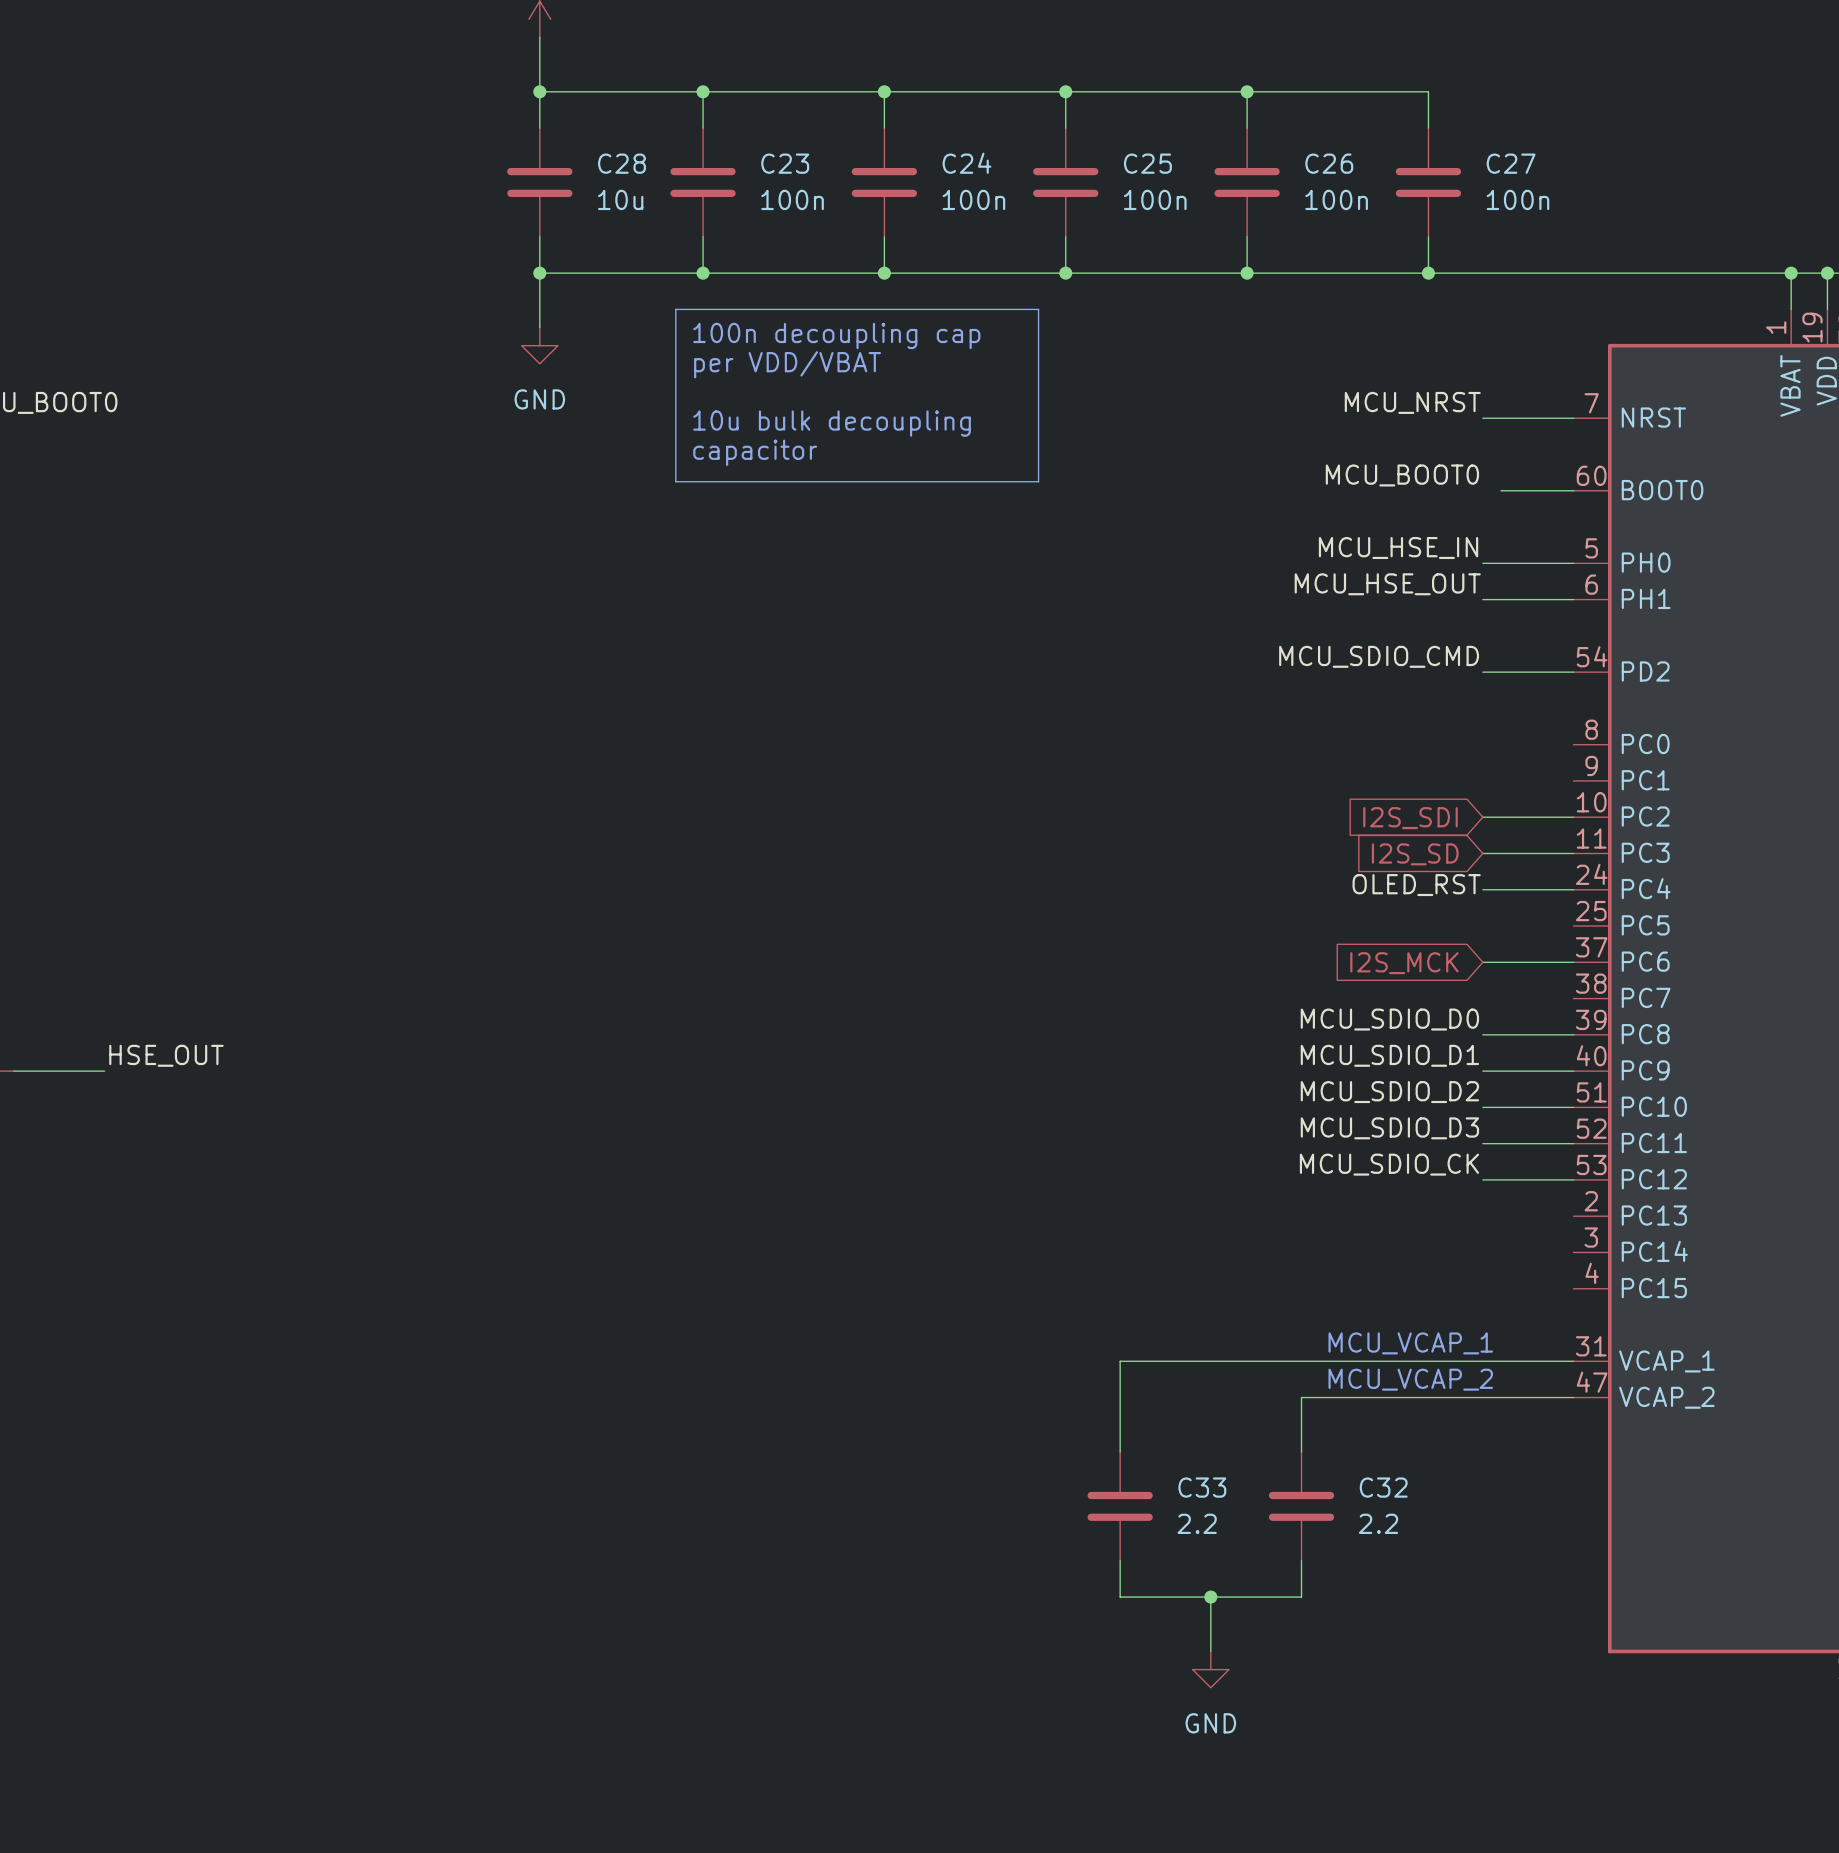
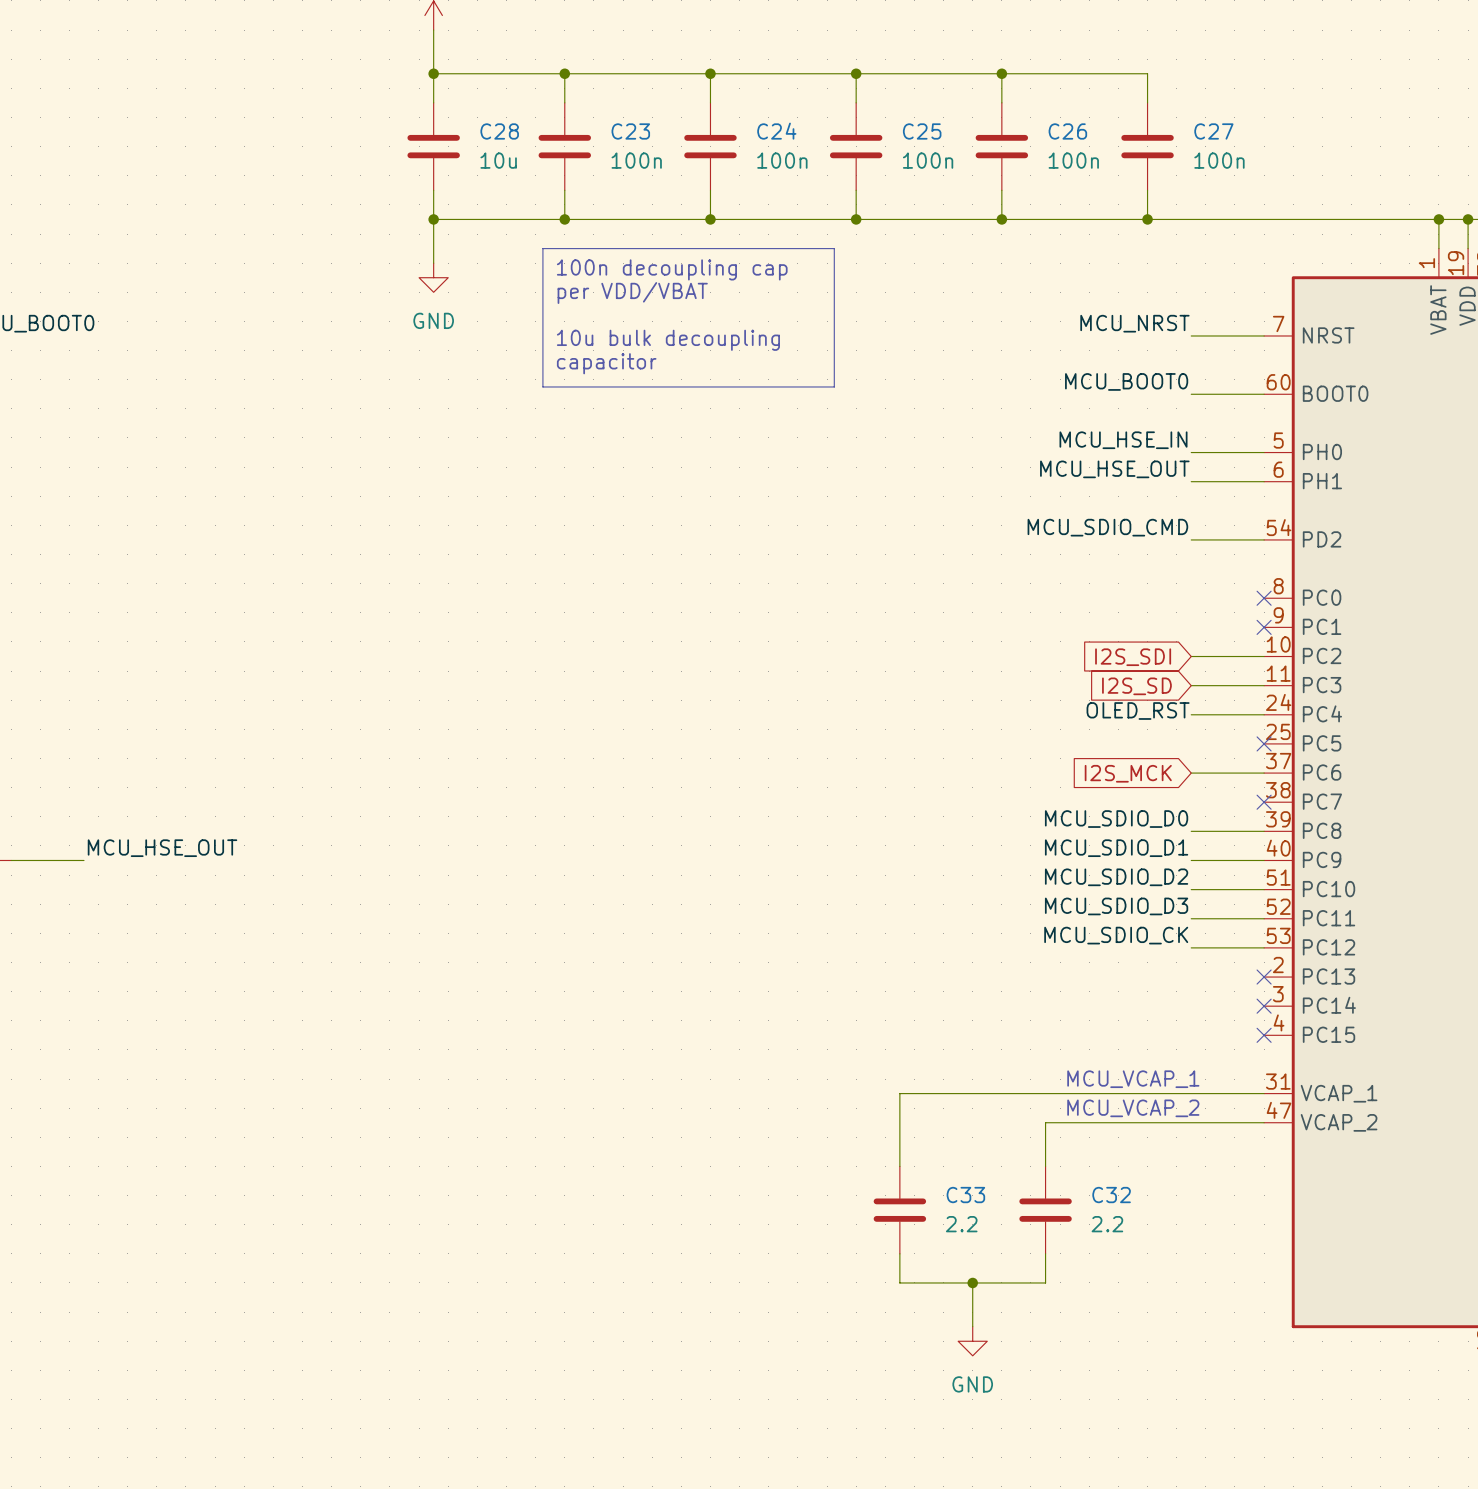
wire: none -> (1191, 394) (1205, 394)
no-connect mark: none -> (1264, 598)
no-connect mark: none -> (1264, 627)
no-connect mark: none -> (1264, 743)
no-connect mark: none -> (1264, 802)
label: HSE_OUT (166, 1055) -> MCU_HSE_OUT (162, 848)
no-connect mark: none -> (1264, 977)
no-connect mark: none -> (1264, 1006)
no-connect mark: none -> (1264, 1035)

